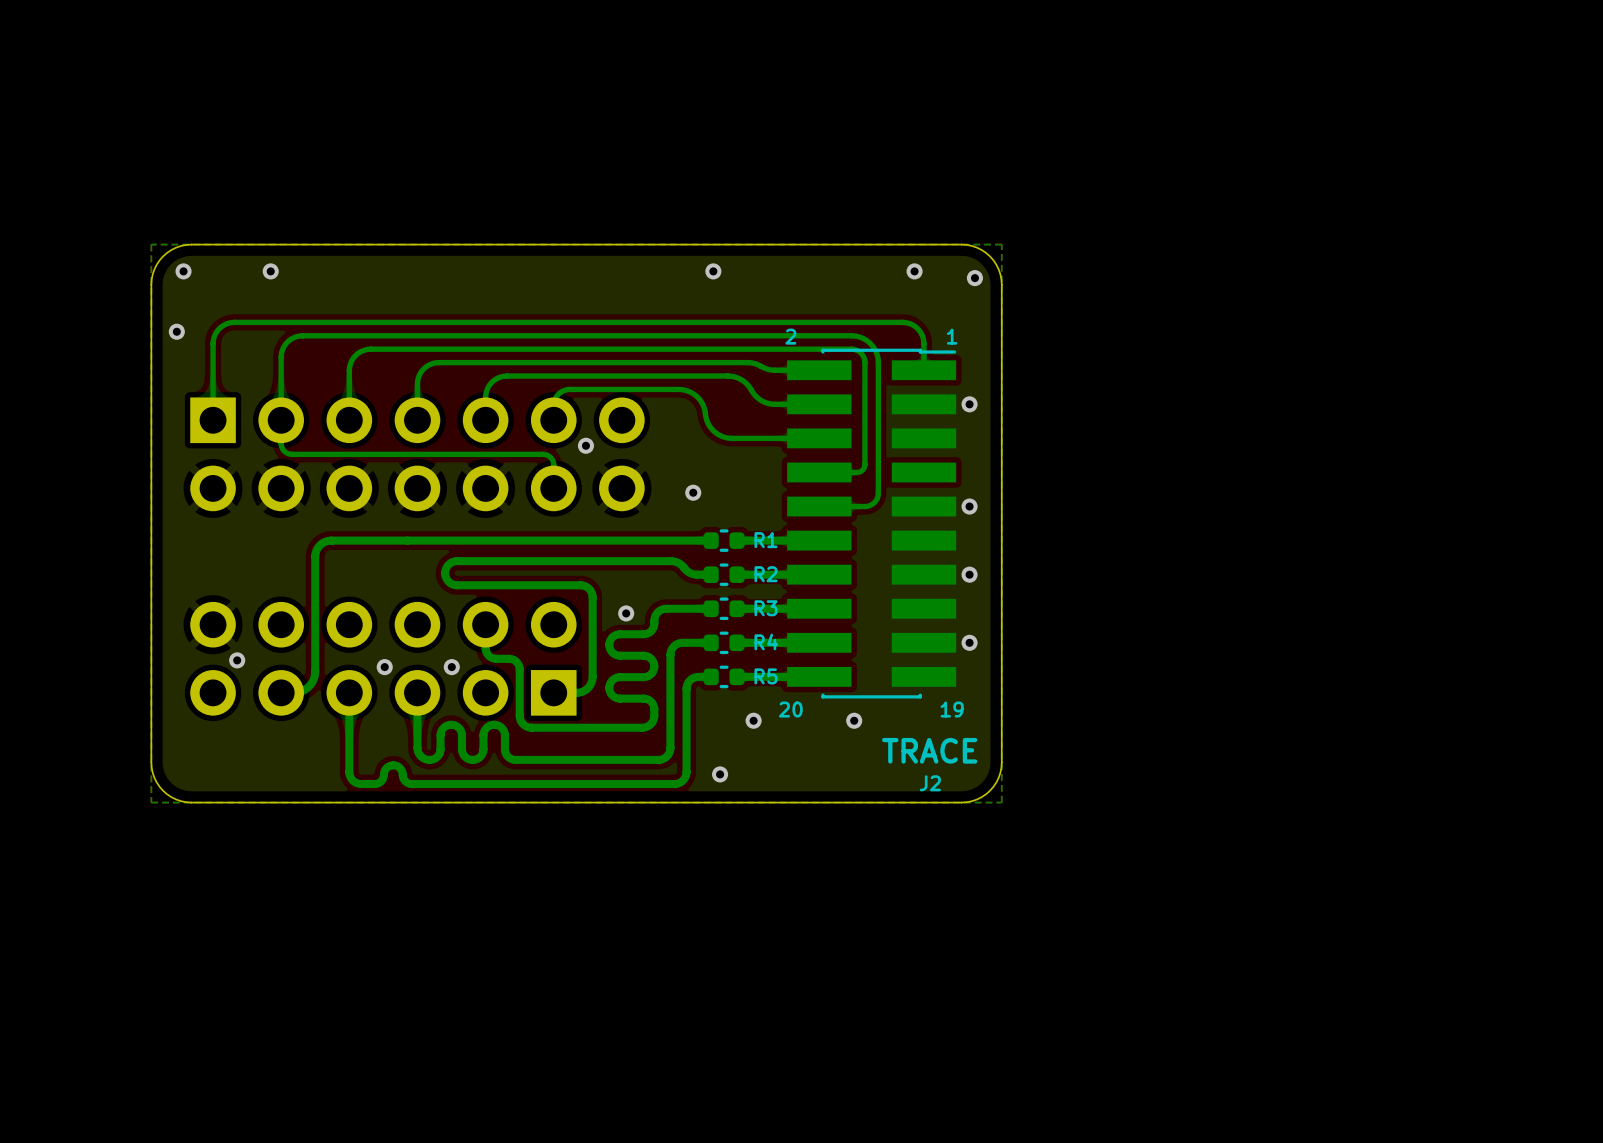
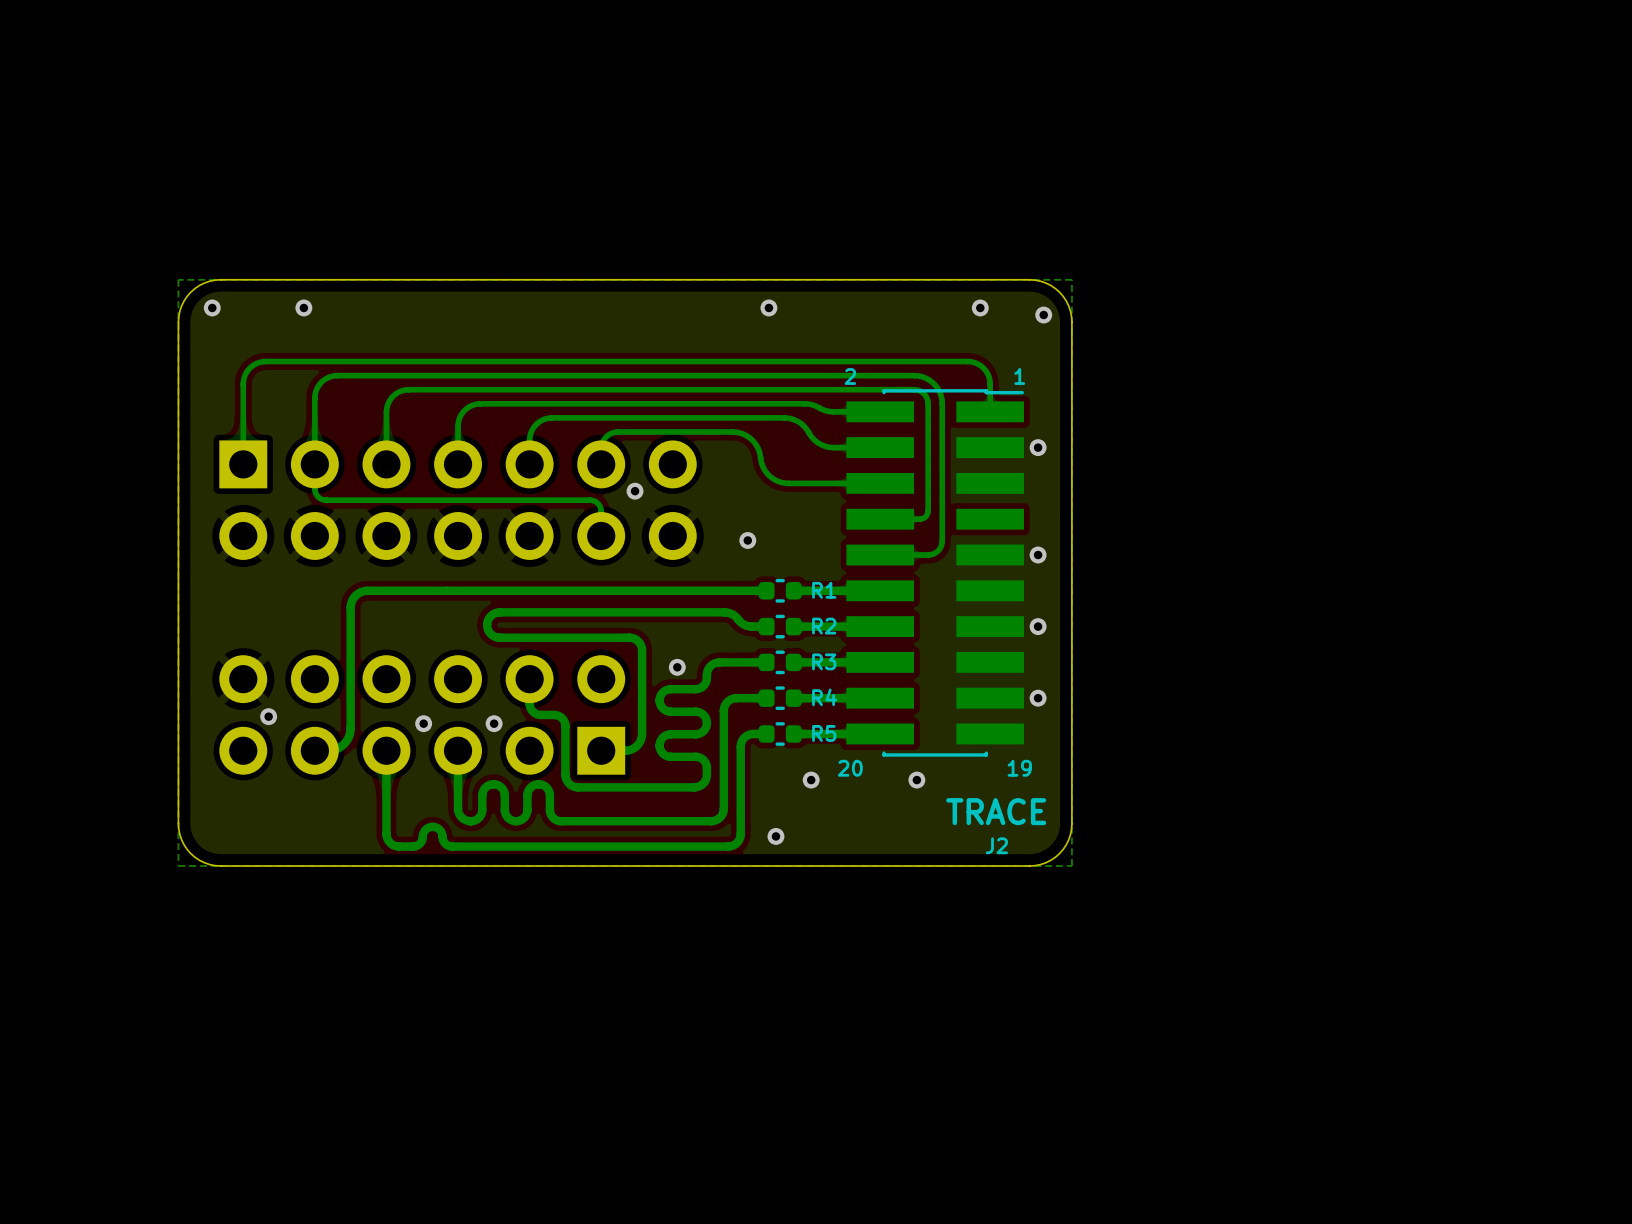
via: (176, 331) -> none

